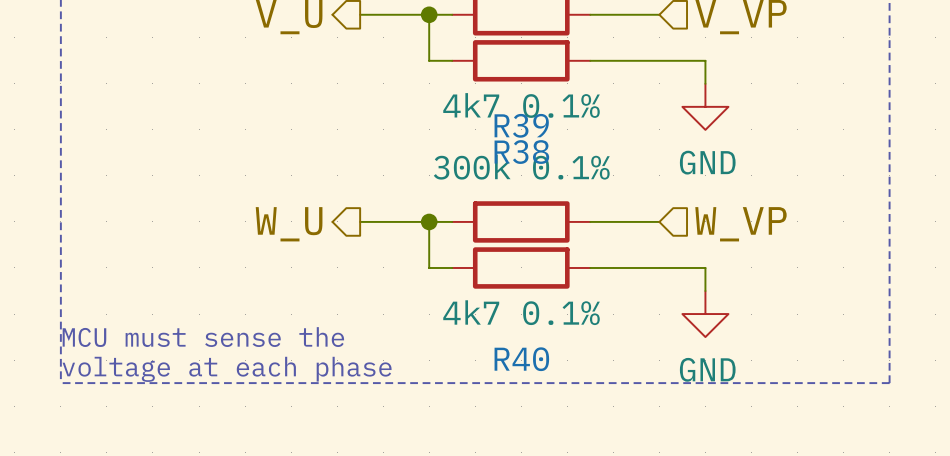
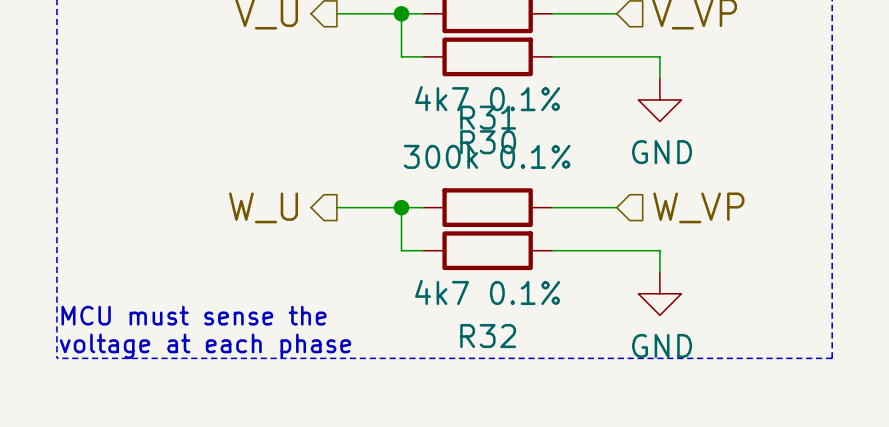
R39 name: R39 (521, 125) -> R31 (488, 117)
R38 name: R38 (521, 152) -> R30 (488, 142)
R40 name: R40 (521, 359) -> R32 (488, 336)

